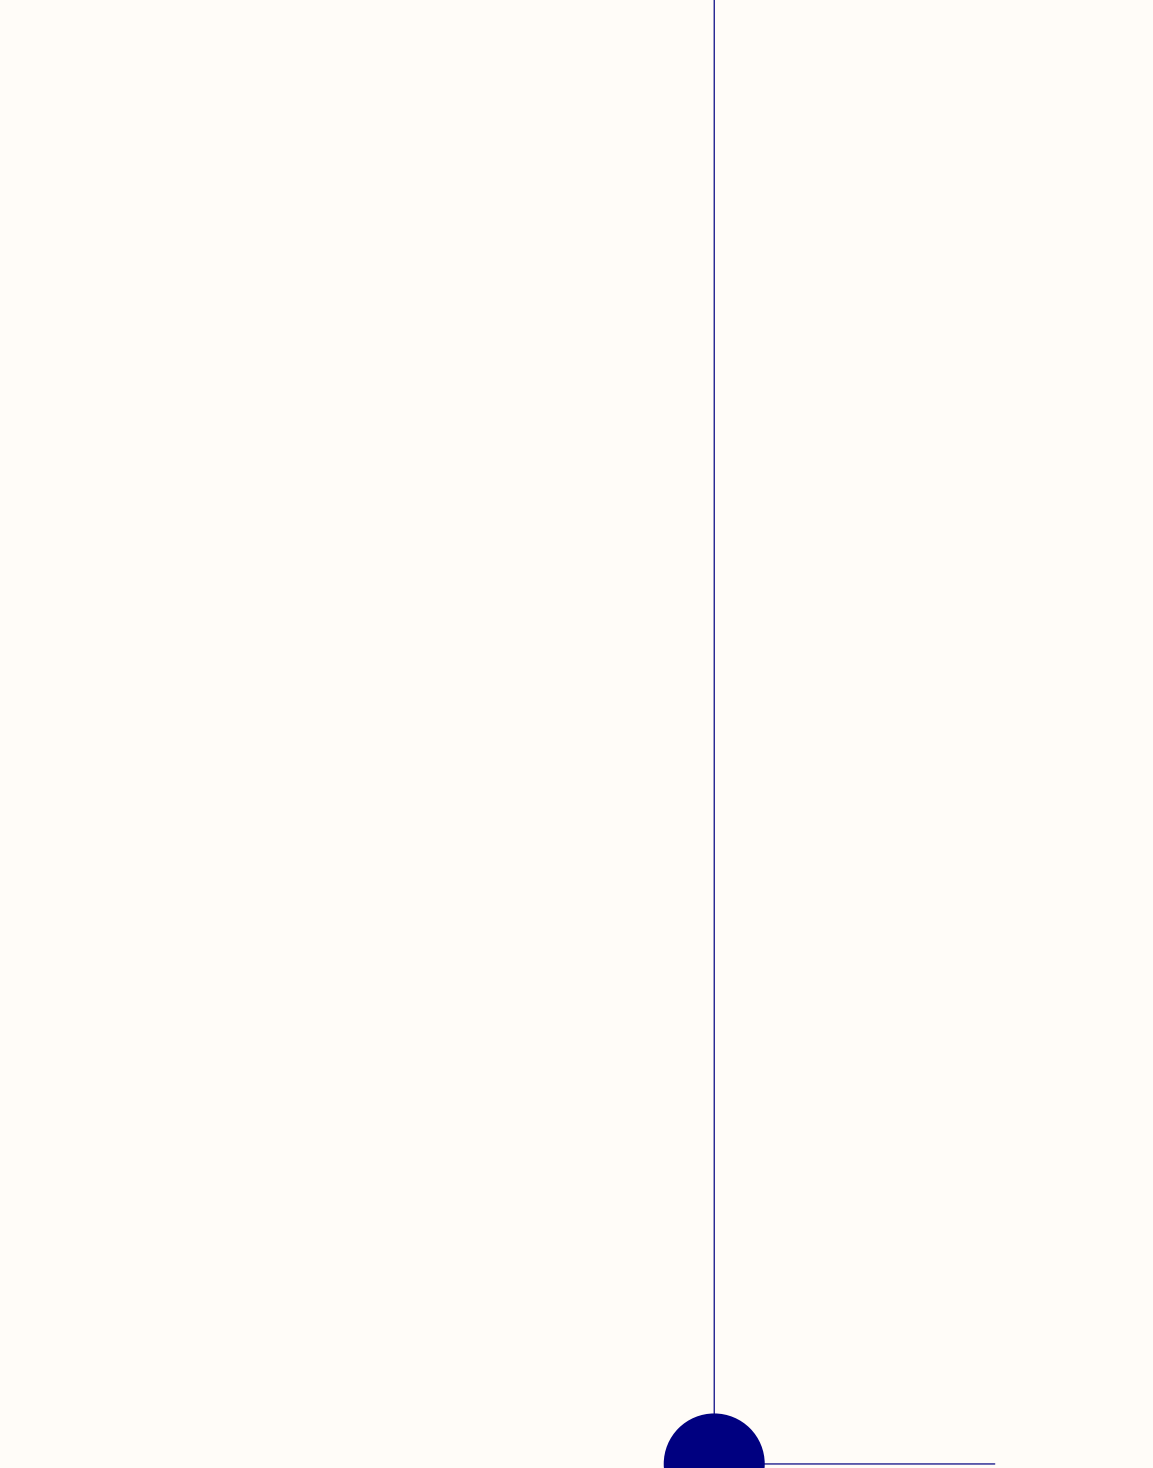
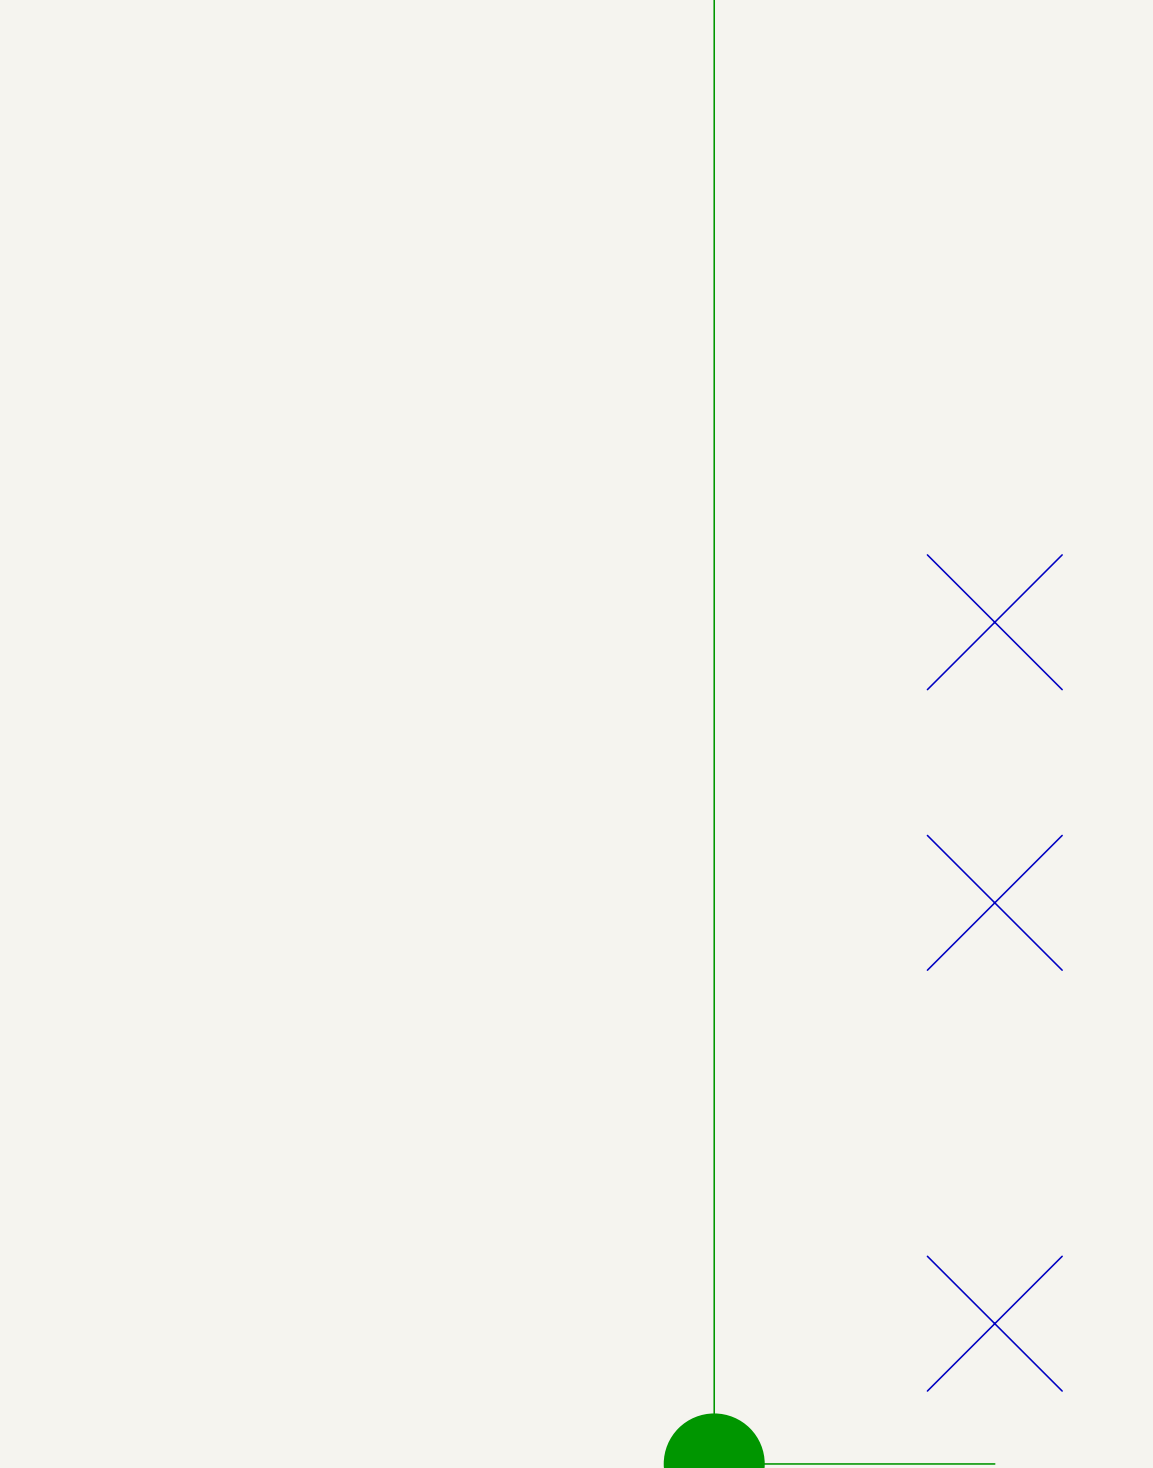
no-connect mark: none -> (994, 622)
no-connect mark: none -> (994, 902)
no-connect mark: none -> (994, 1323)

